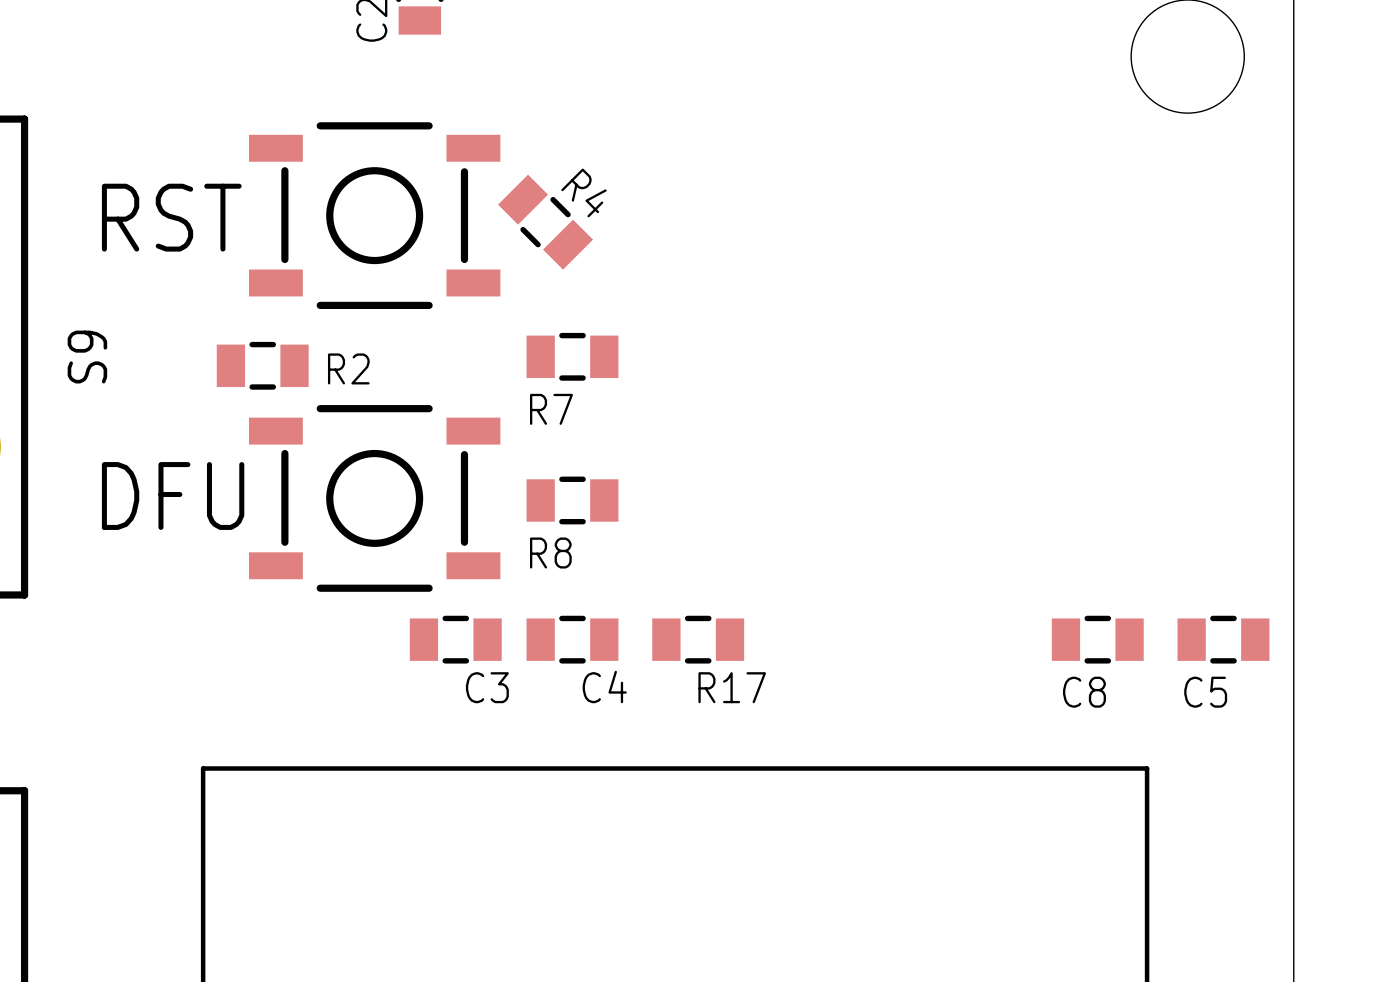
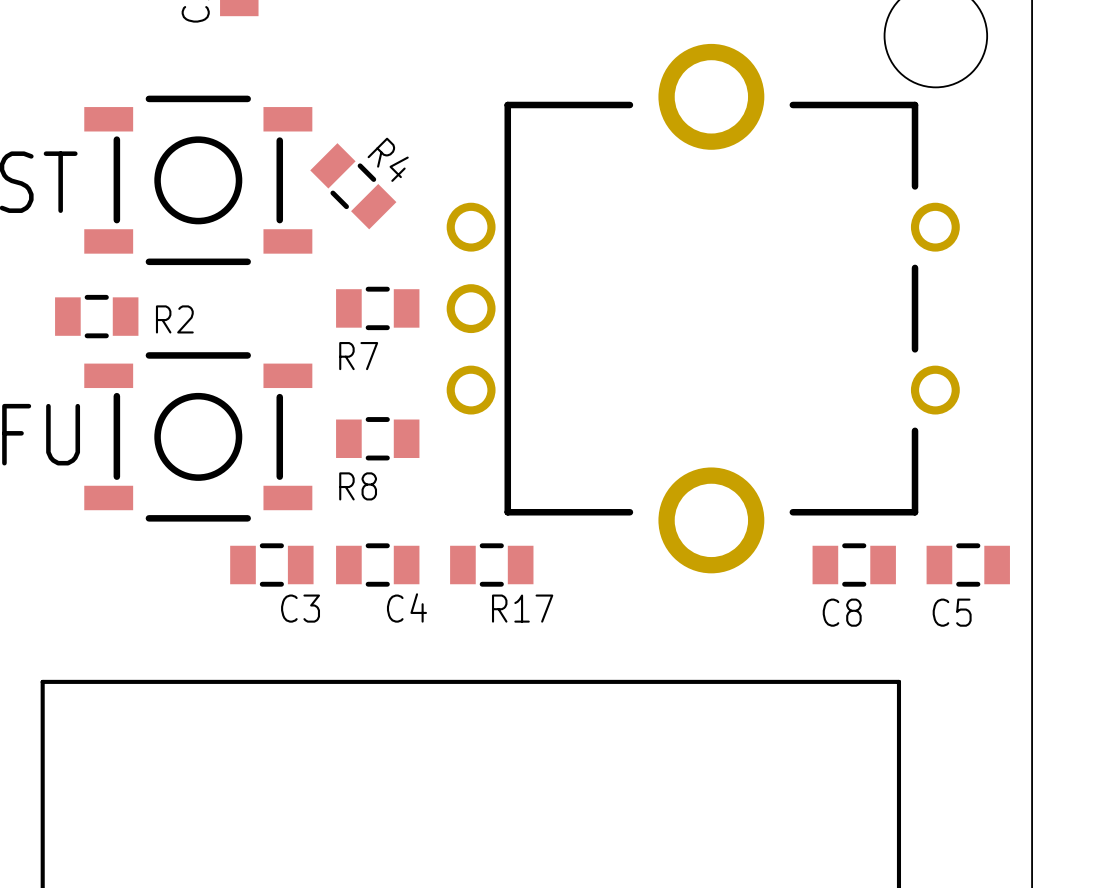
part: none -> (703, 308)

